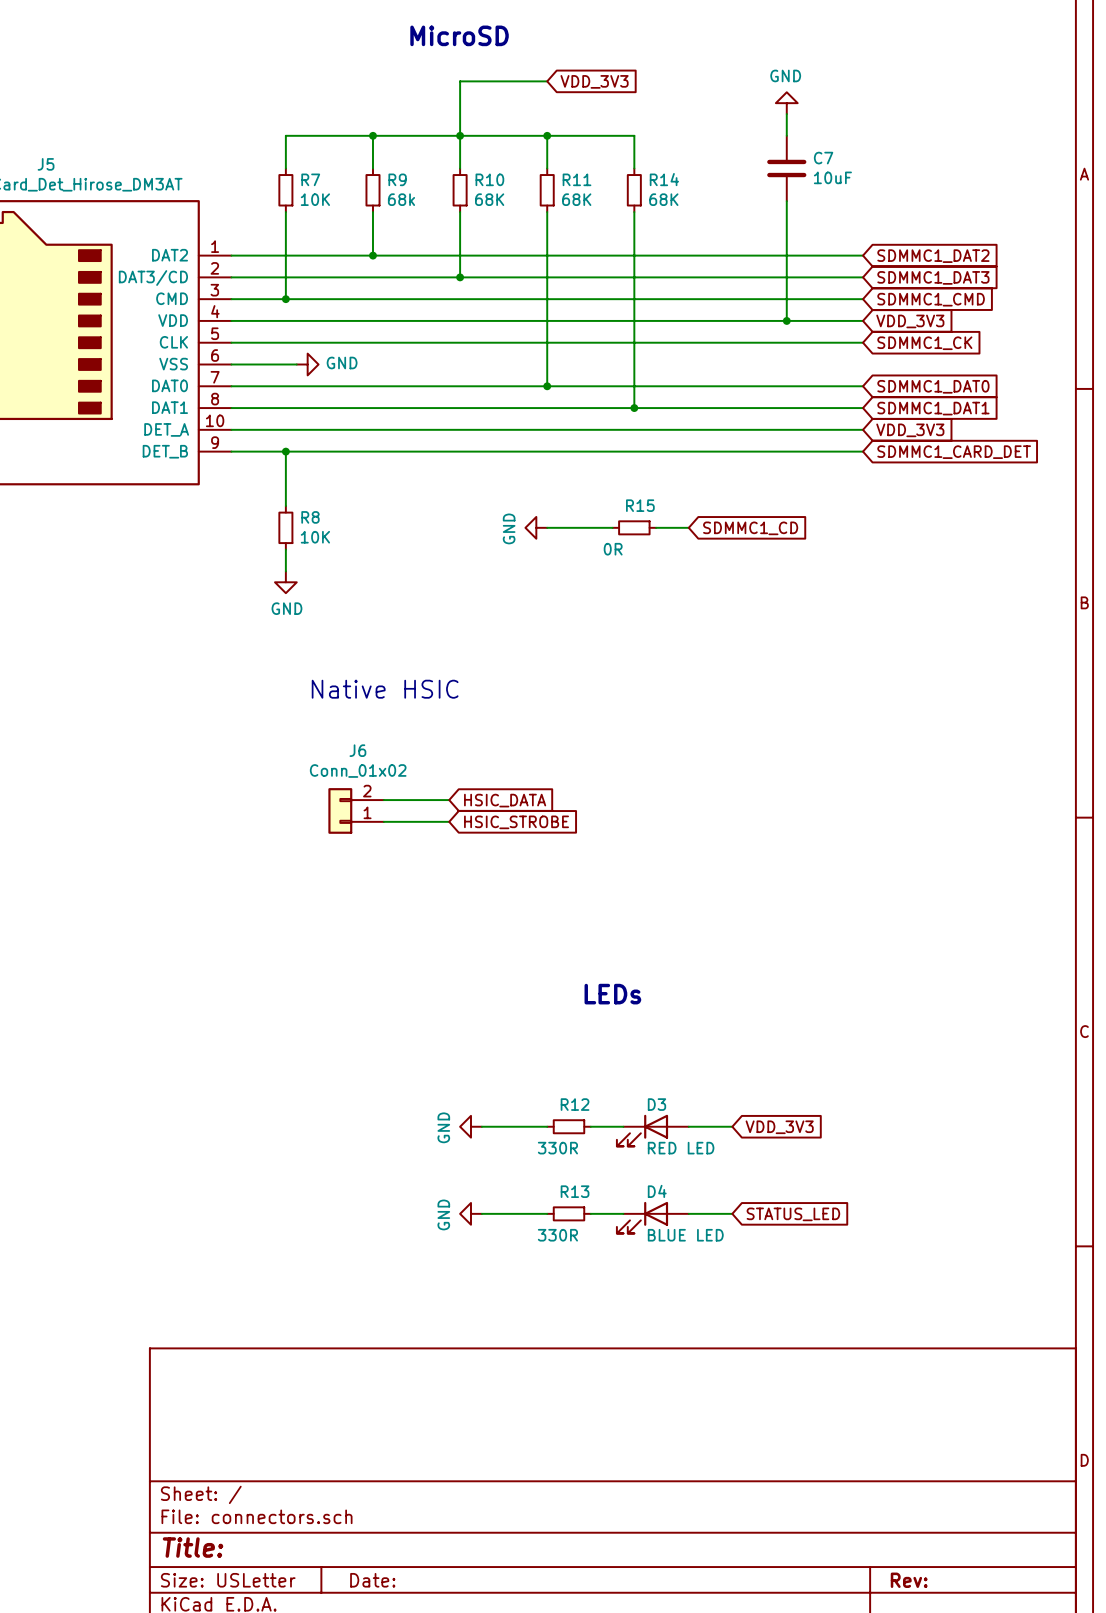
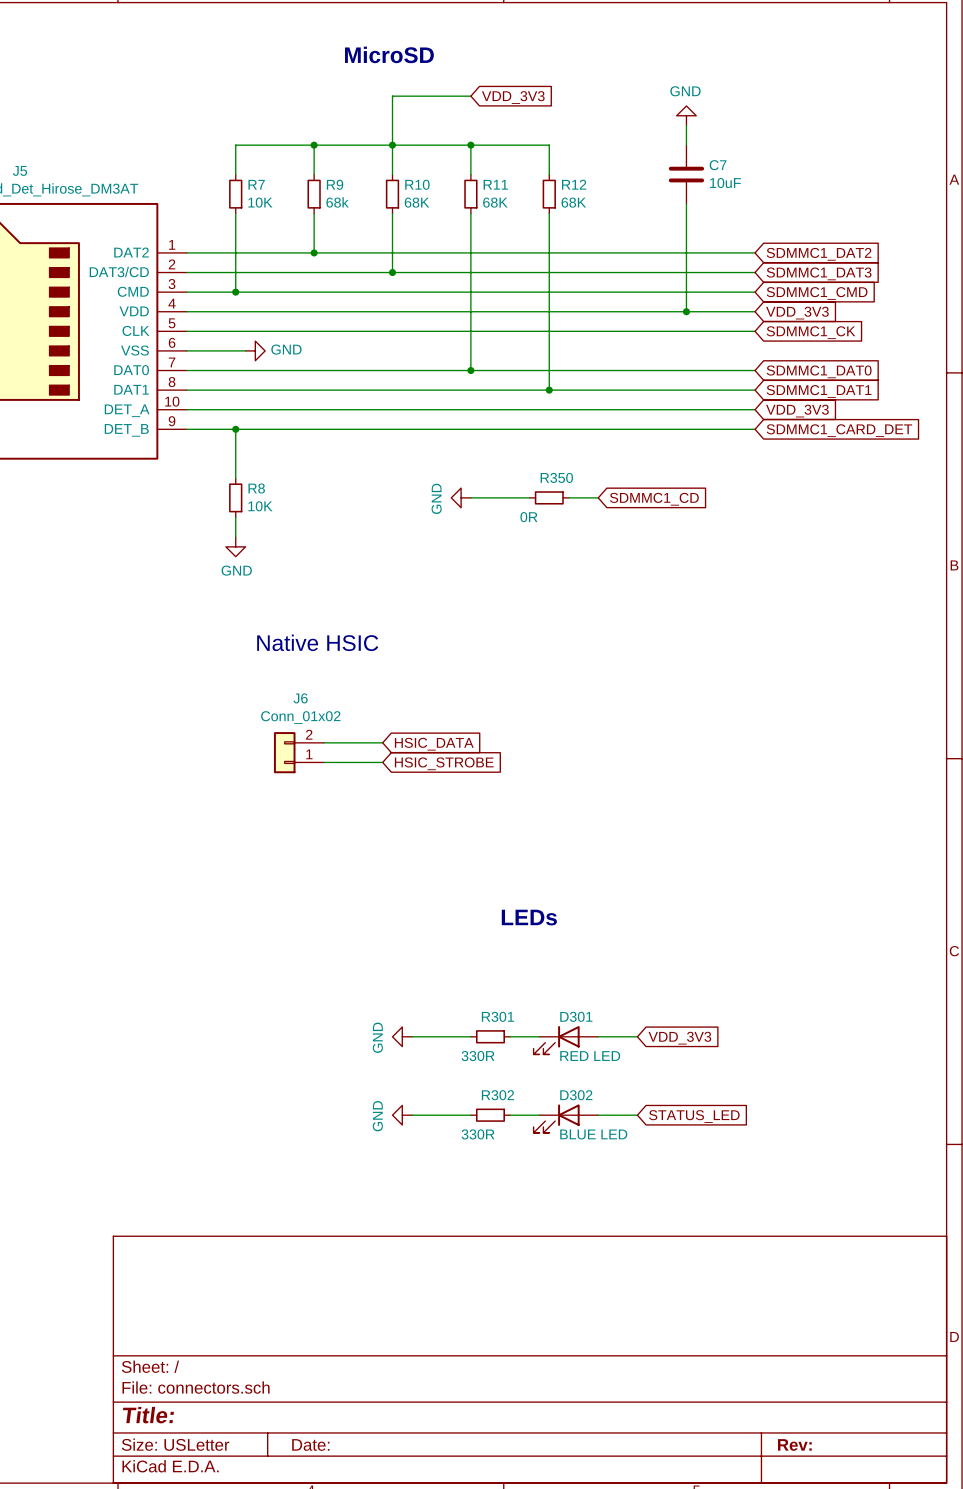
R14 name: R14 (664, 179) -> R12 (574, 184)
R15 name: R15 (640, 505) -> R350 (556, 477)
R12 name: R12 (575, 1104) -> R301 (497, 1016)
D3 name: D3 (656, 1104) -> D301 (576, 1016)
R13 name: R13 (575, 1191) -> R302 (497, 1095)
D4 name: D4 (657, 1191) -> D302 (576, 1095)

